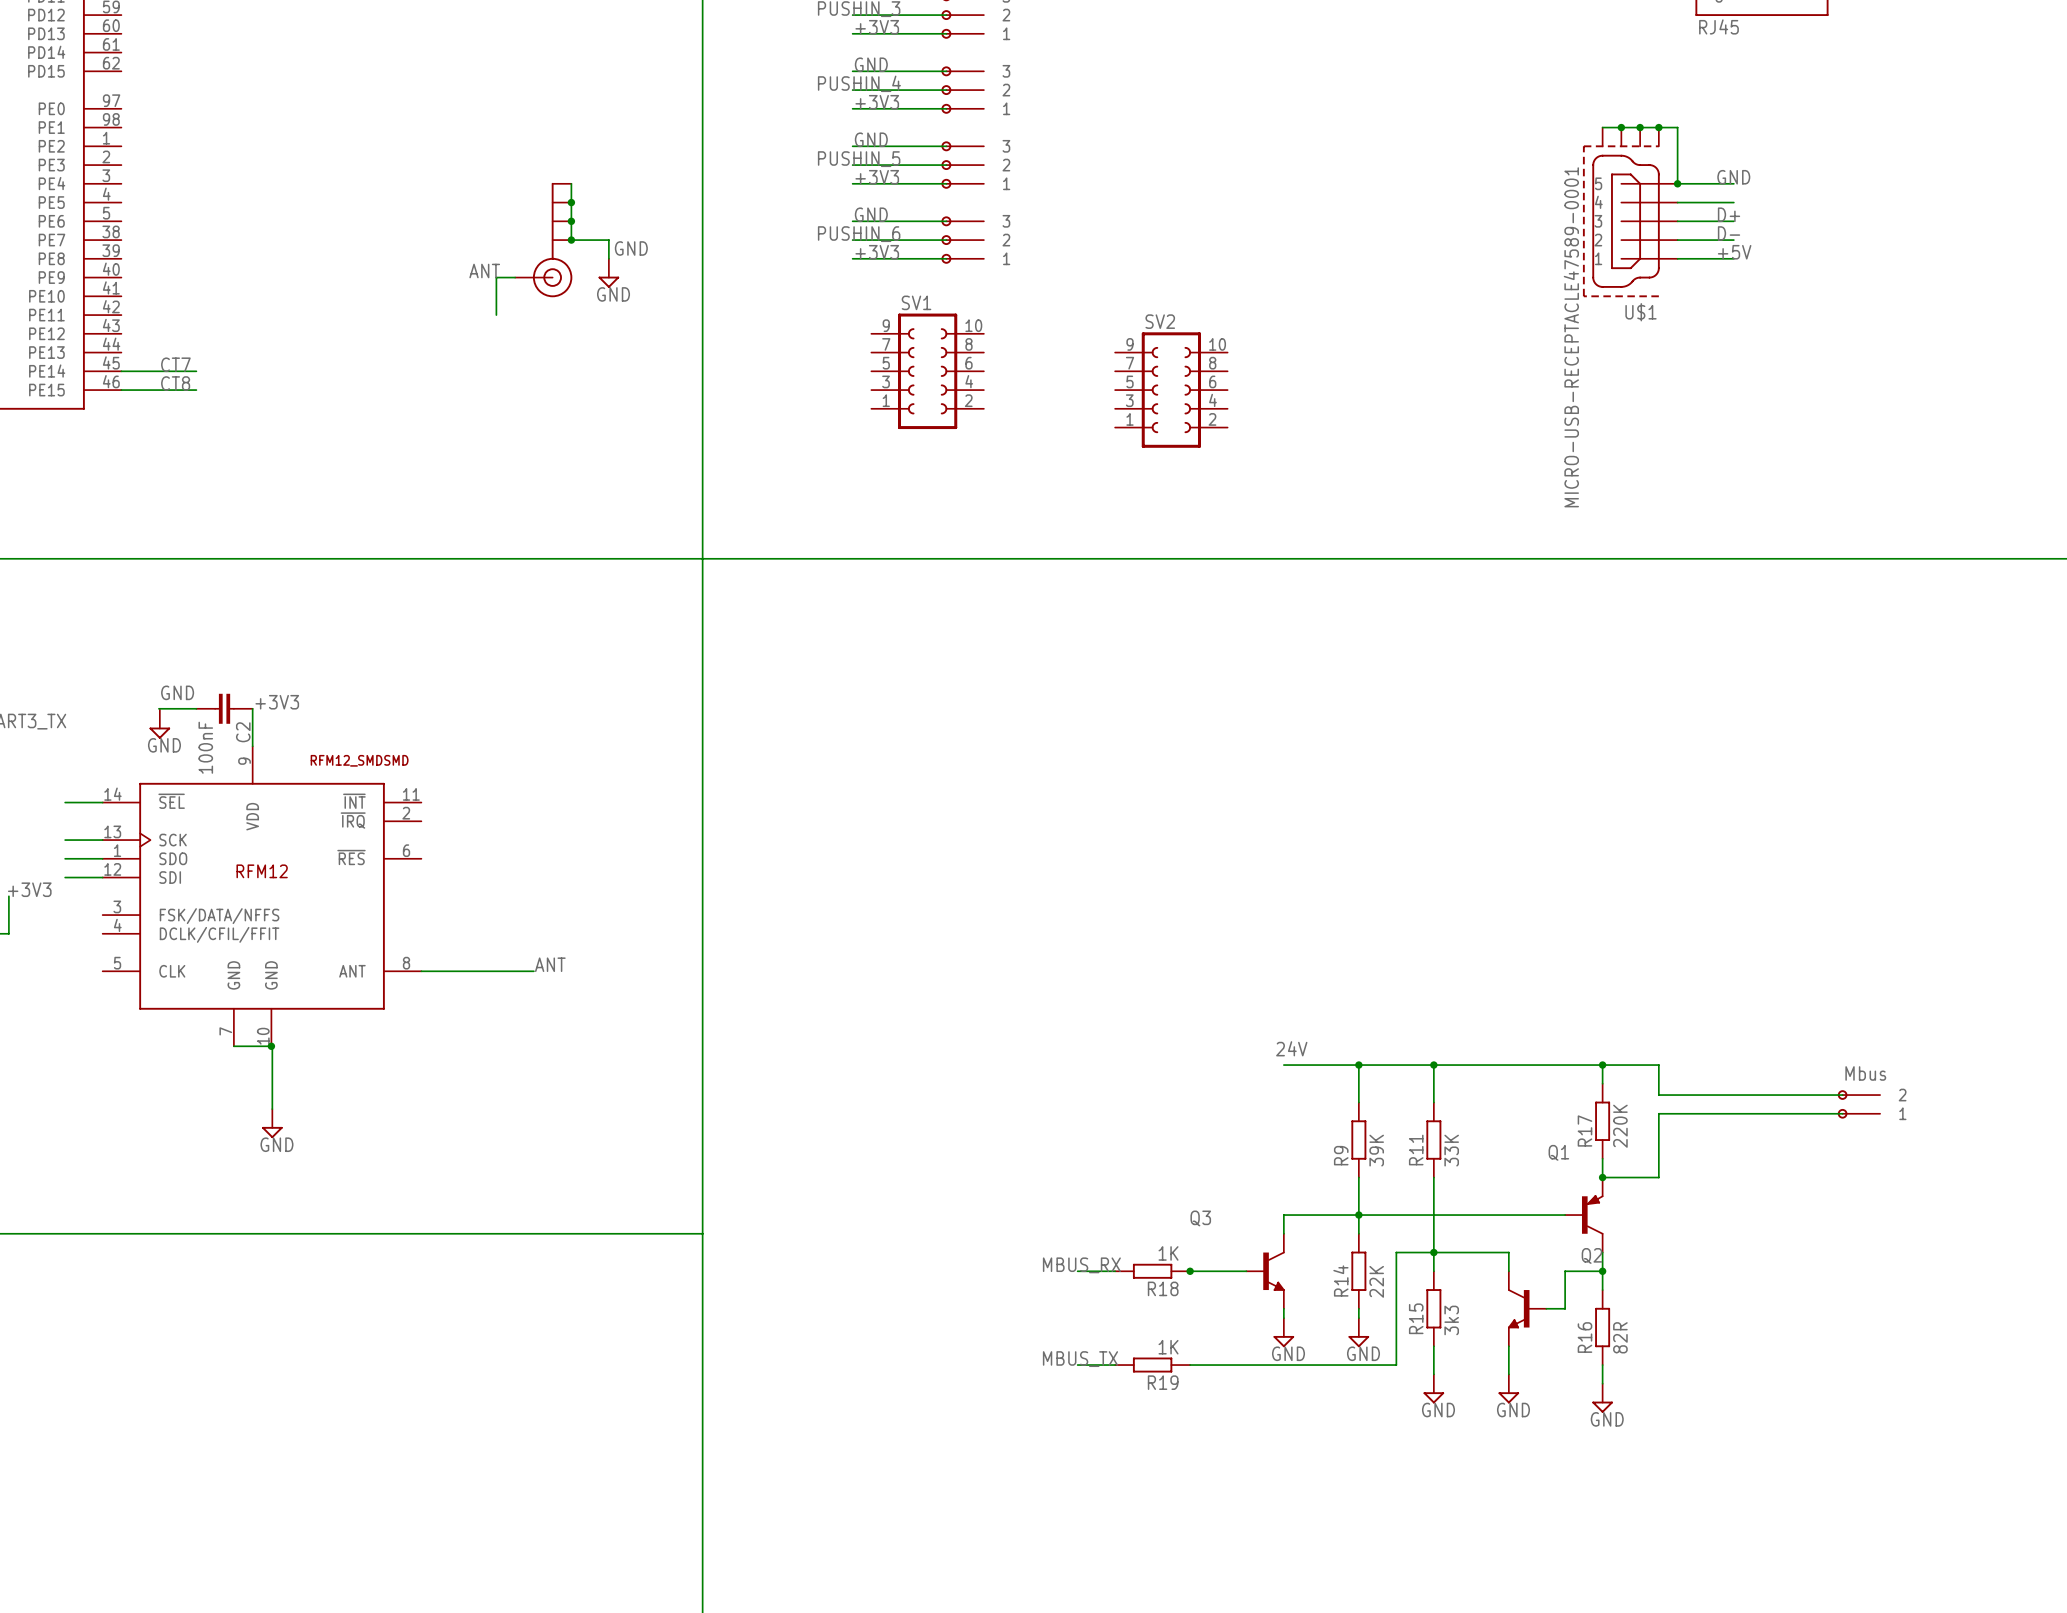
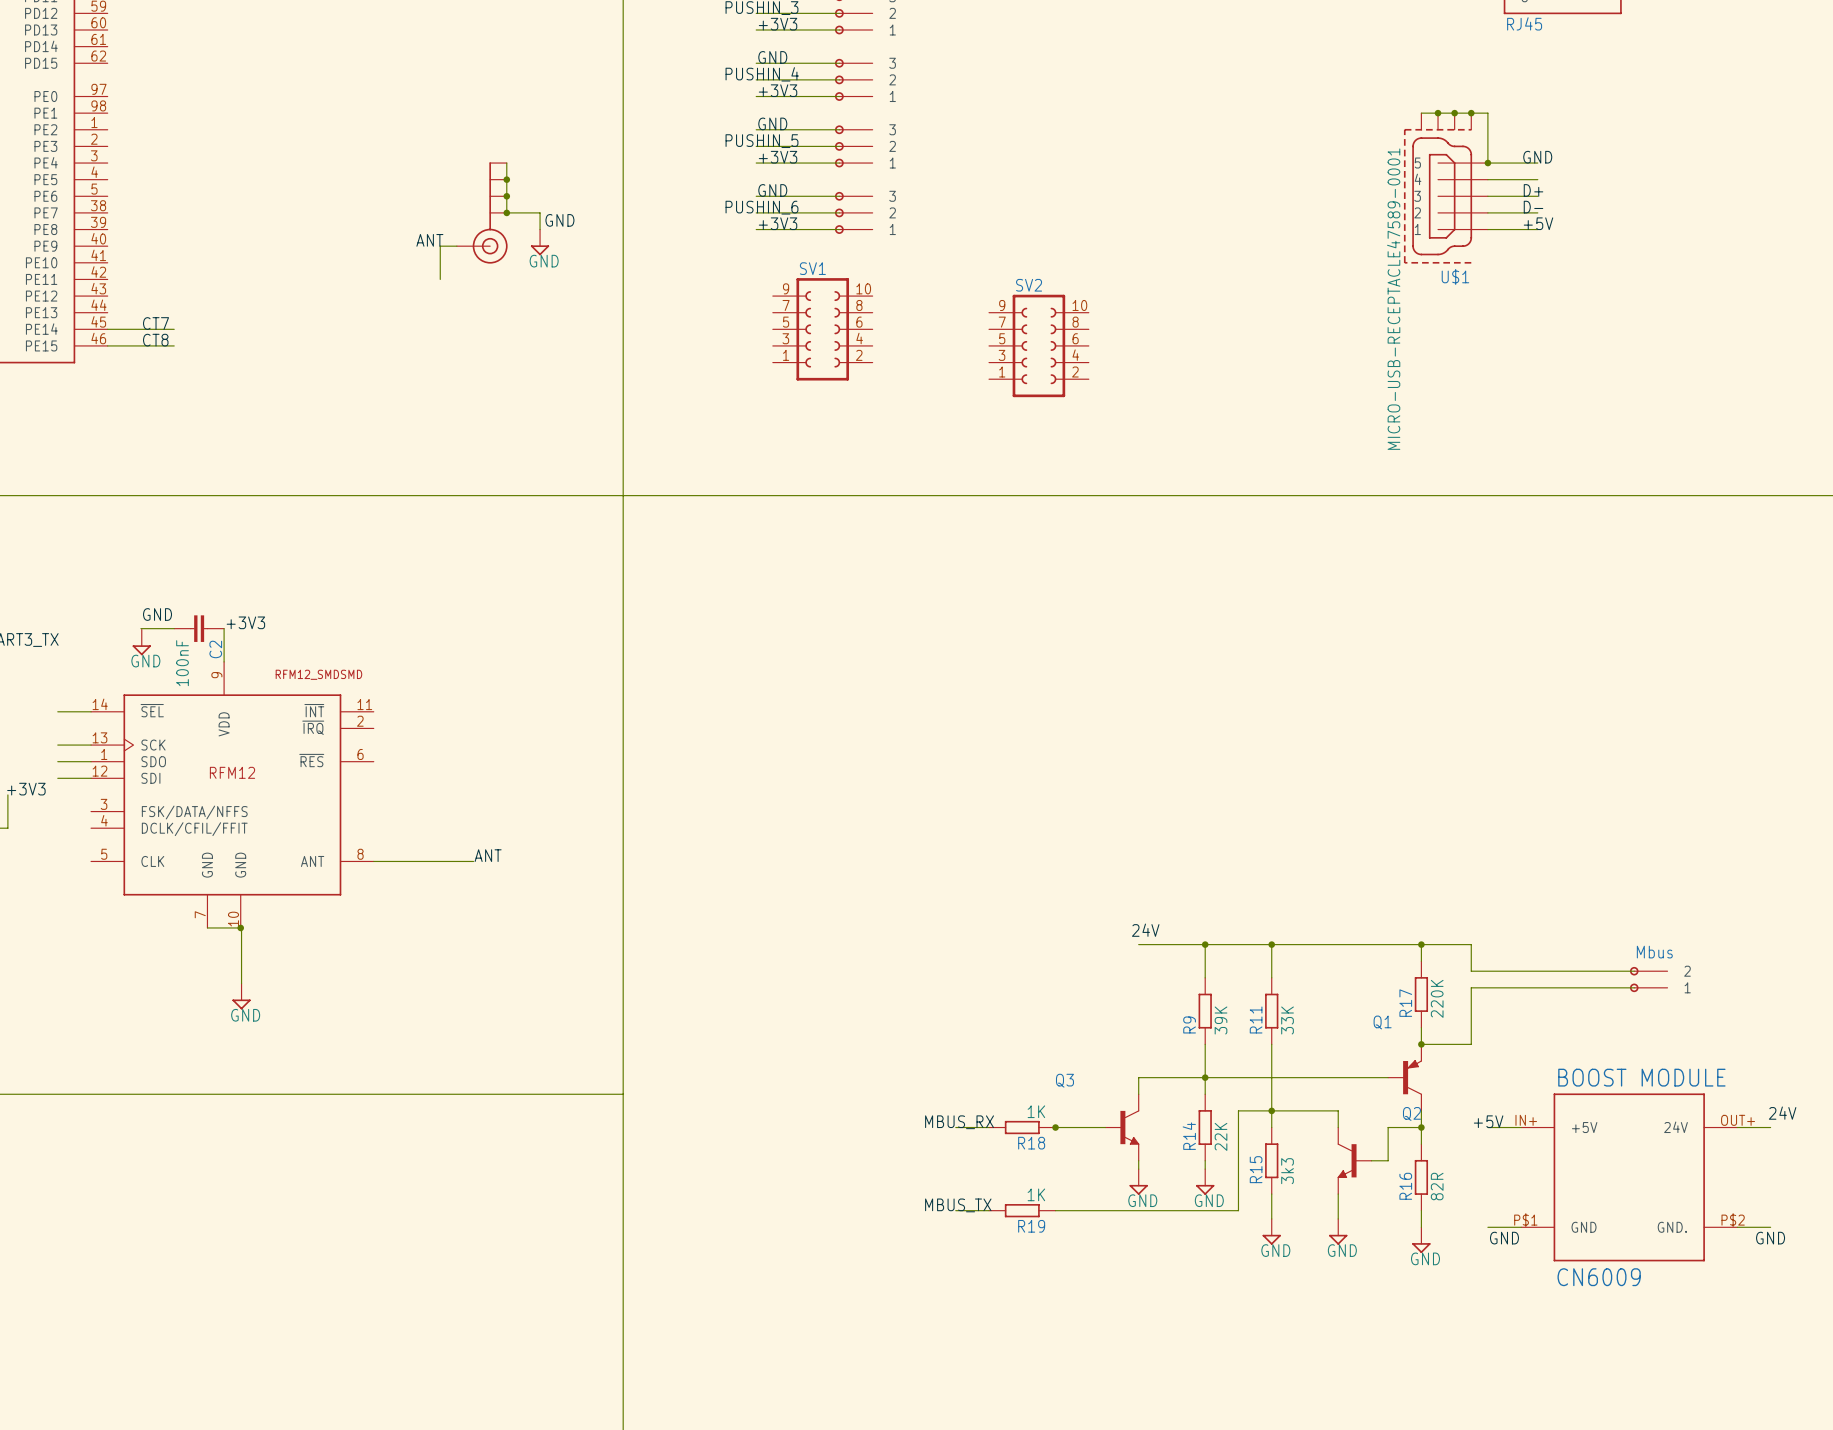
label: none -> 24V (1782, 1113)
label: none -> +5V (1488, 1121)
wire: none -> (1487, 1127) (1521, 1127)
wire: none -> (1737, 1127) (1770, 1127)
part: none -> (1629, 1177)
wire: none -> (1487, 1227) (1521, 1227)
wire: none -> (1737, 1227) (1770, 1227)
label: none -> GND (1504, 1238)
label: none -> GND (1770, 1238)

